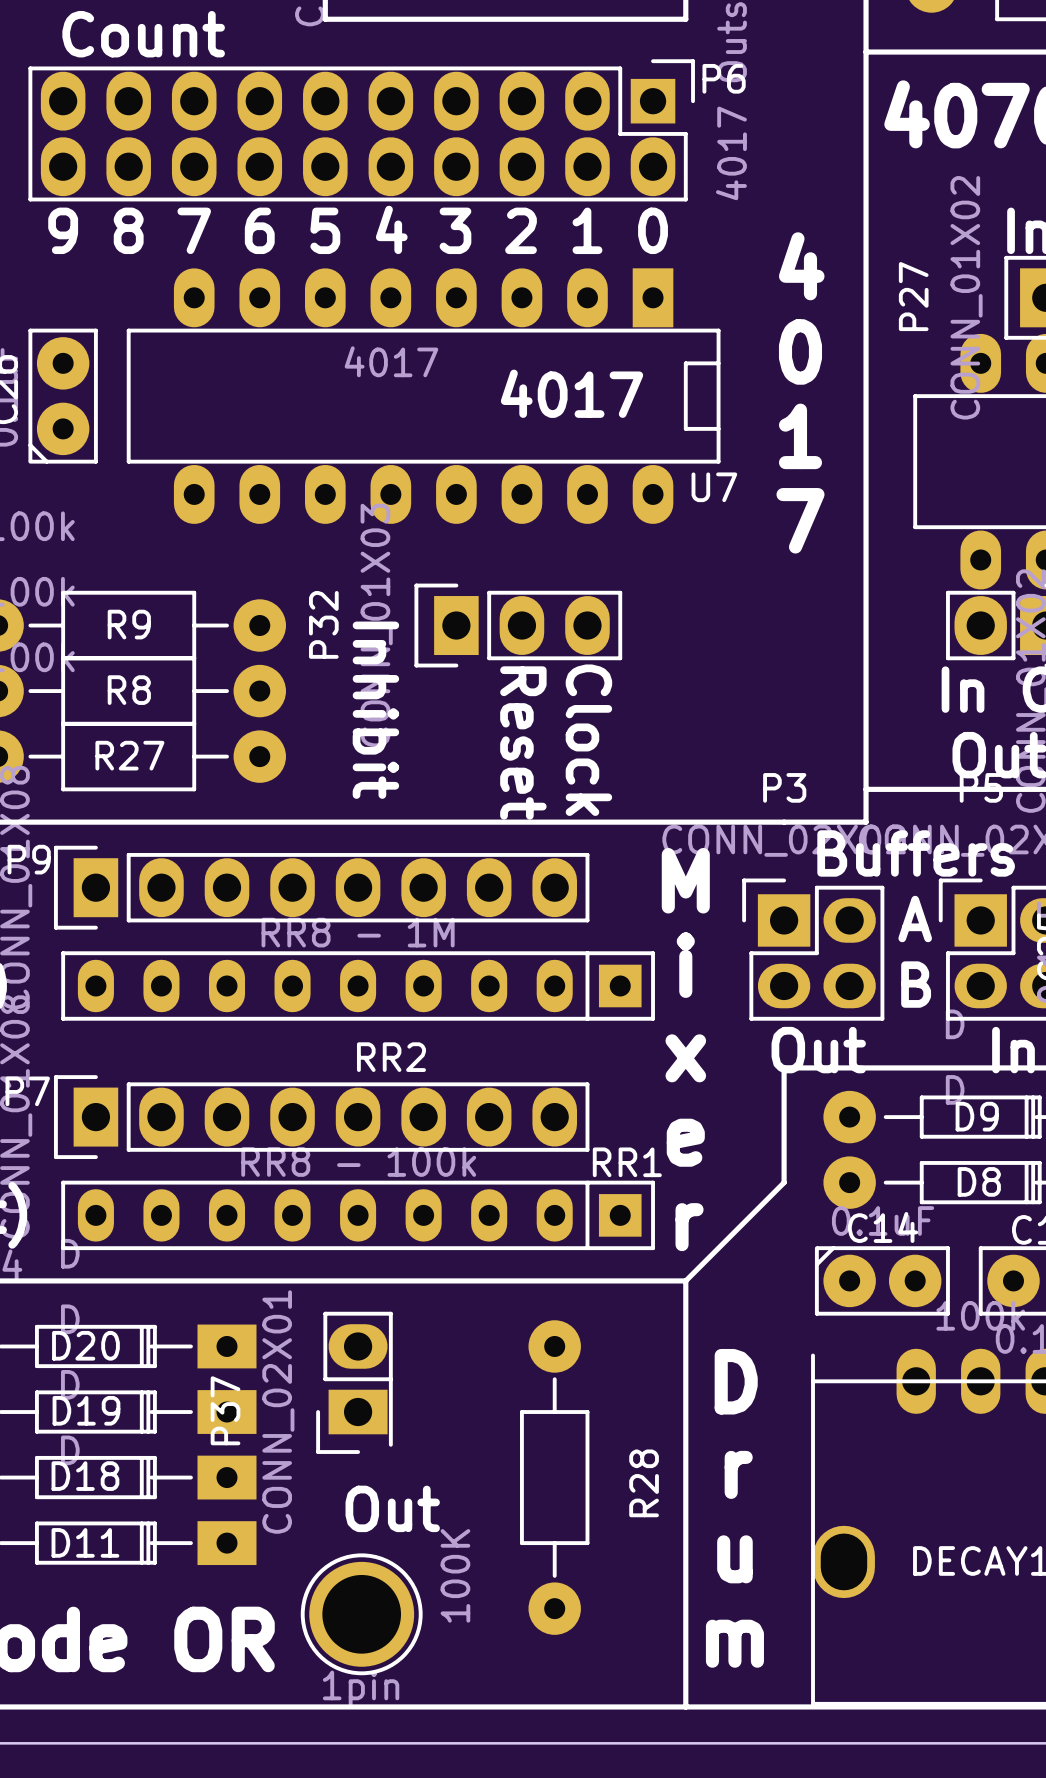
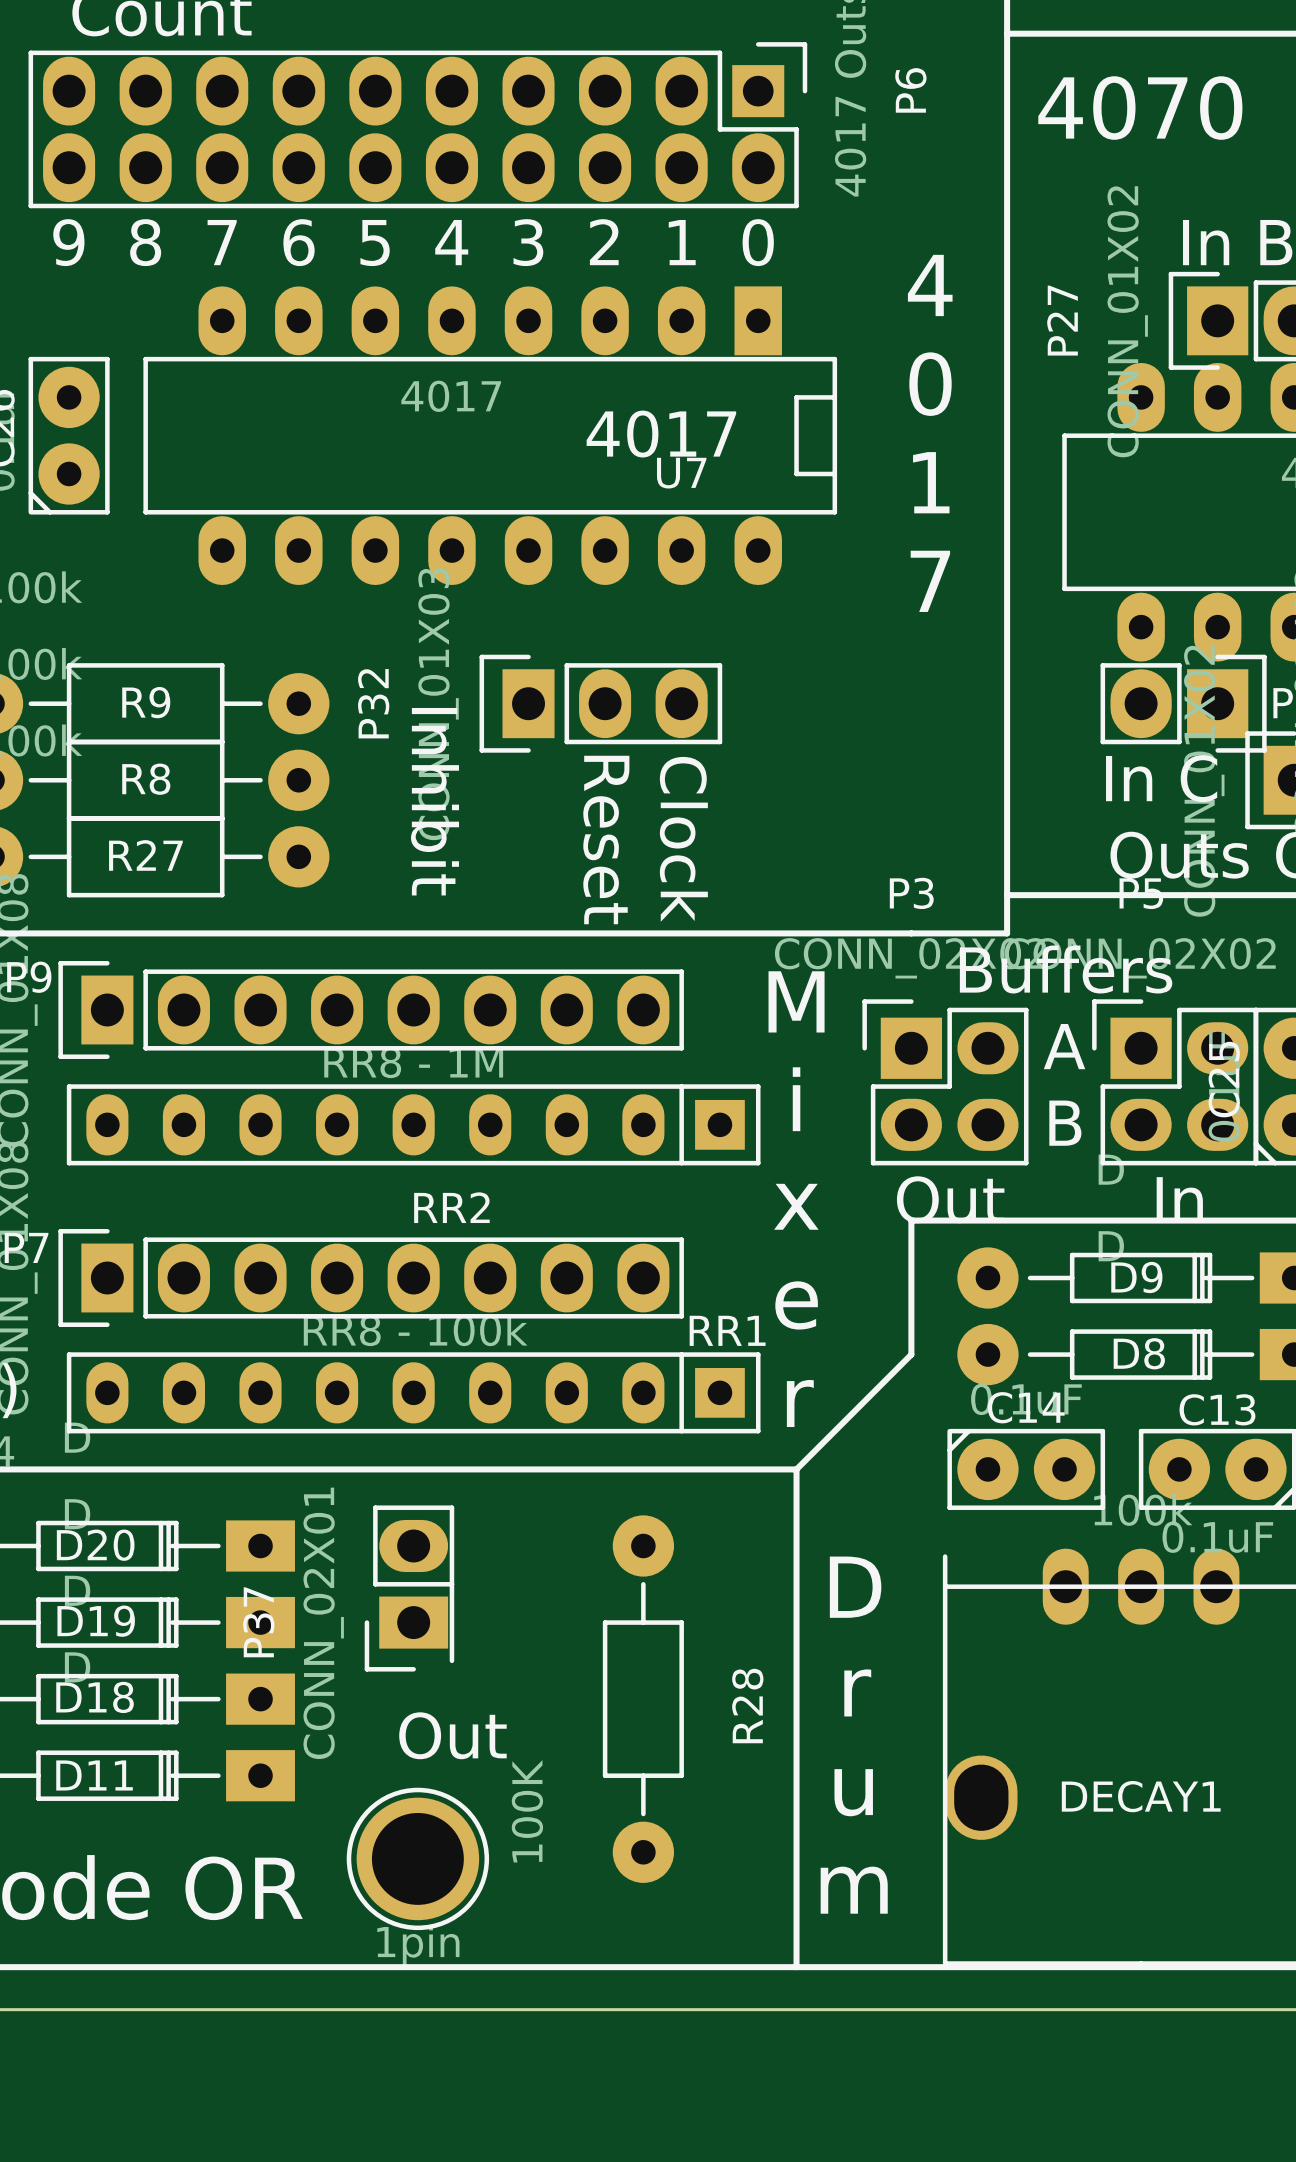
P6 name rotation: 0° (724, 78) -> 90° counterclockwise (910, 90)
P6 name position: P6 (724, 78) -> P6 (910, 90)
U7 name position: U7 (714, 487) -> U7 (681, 473)

